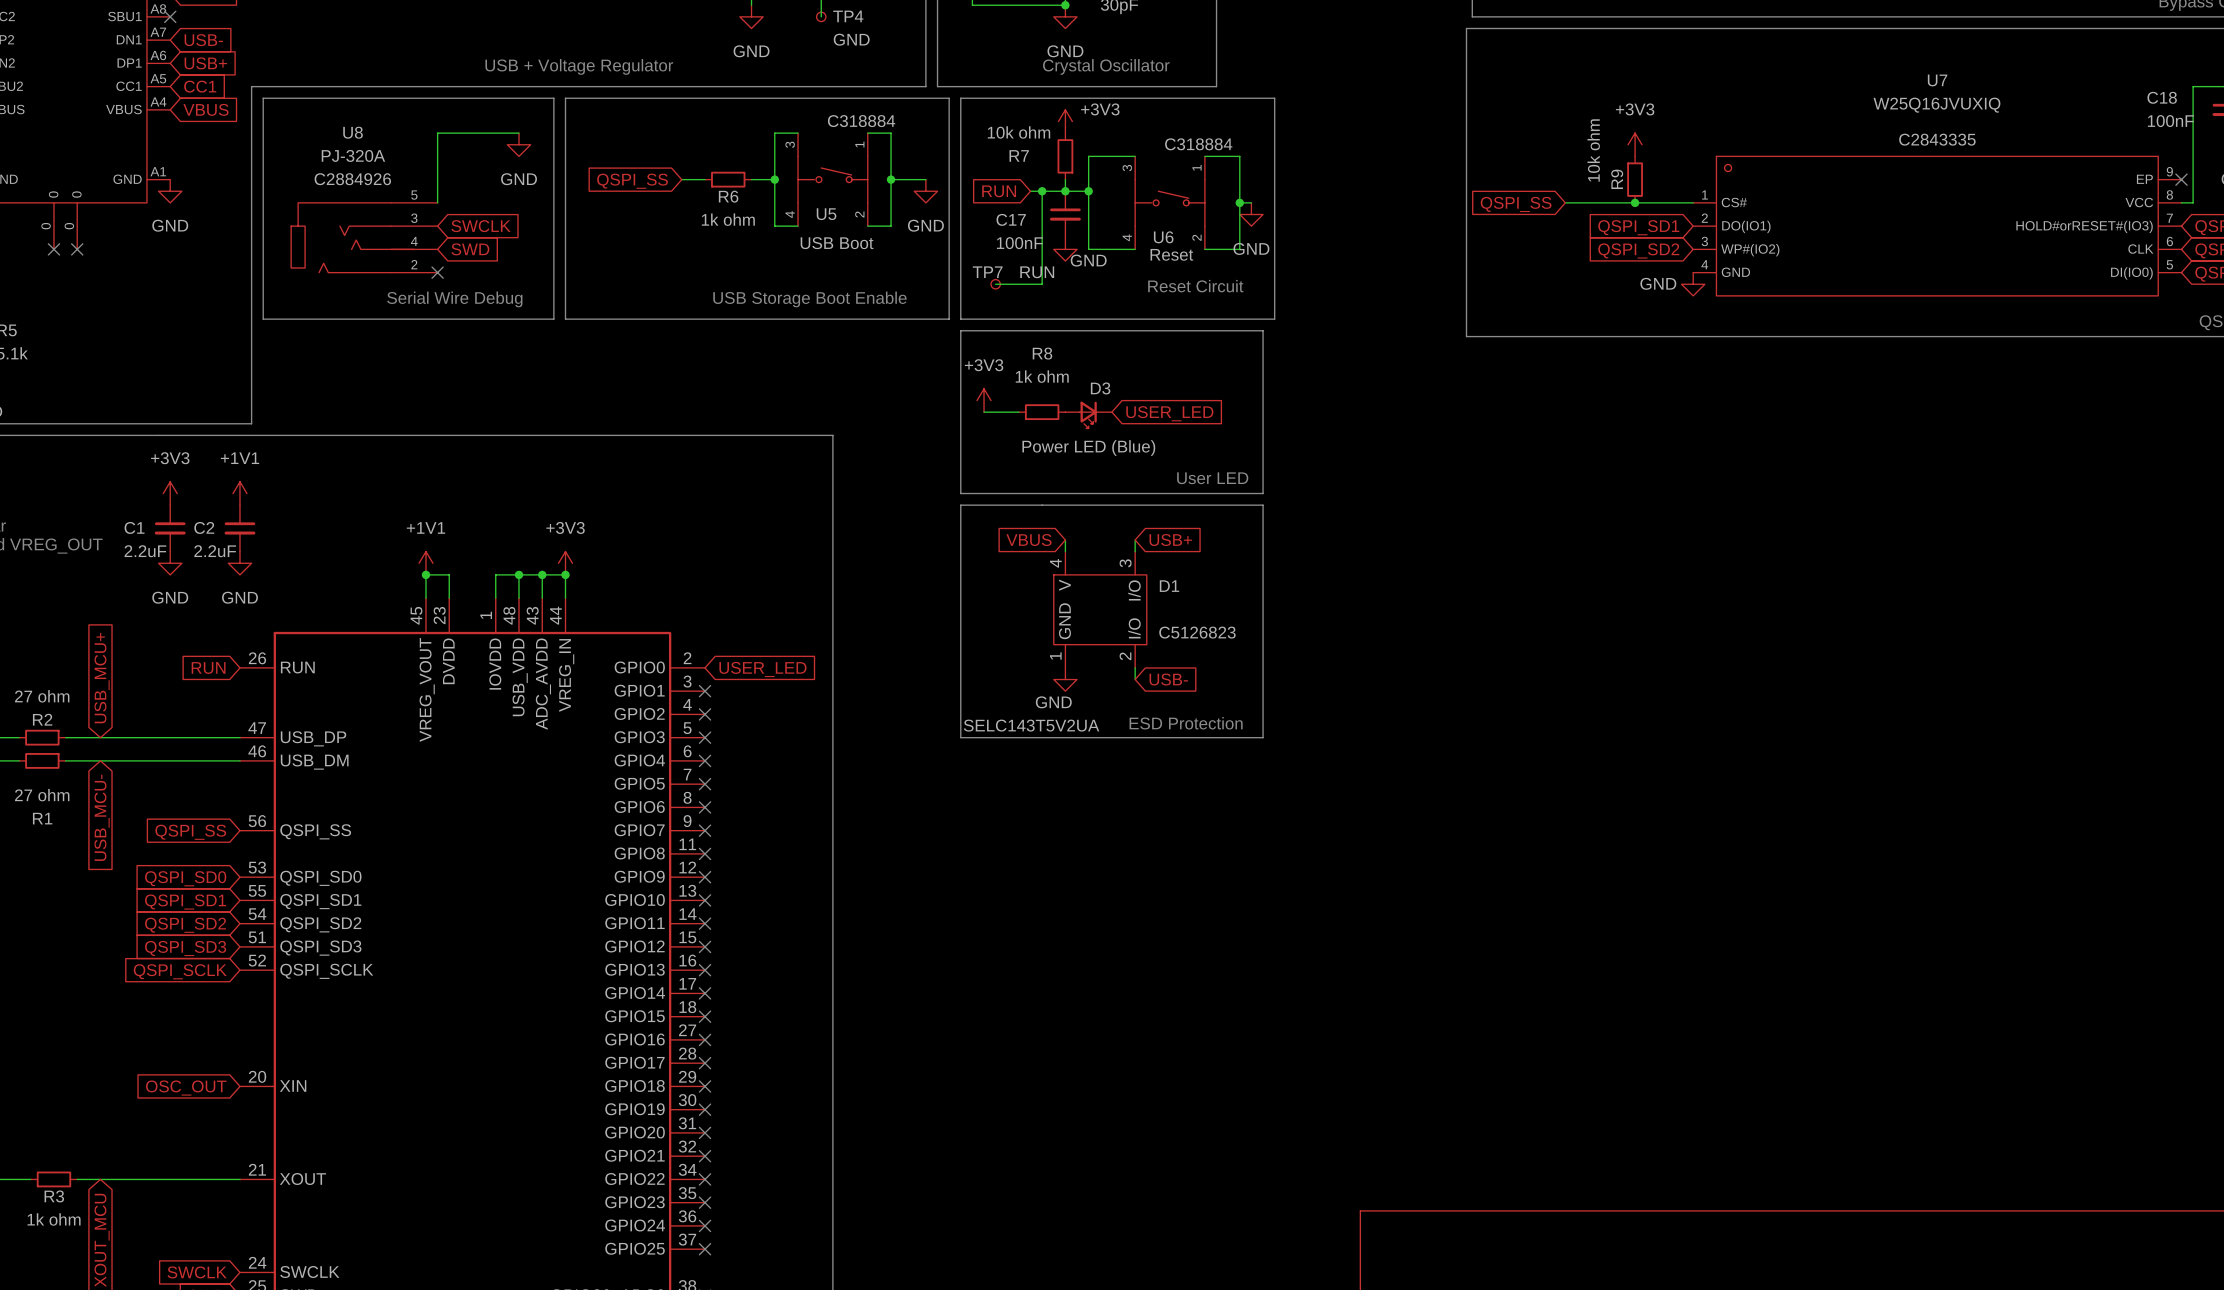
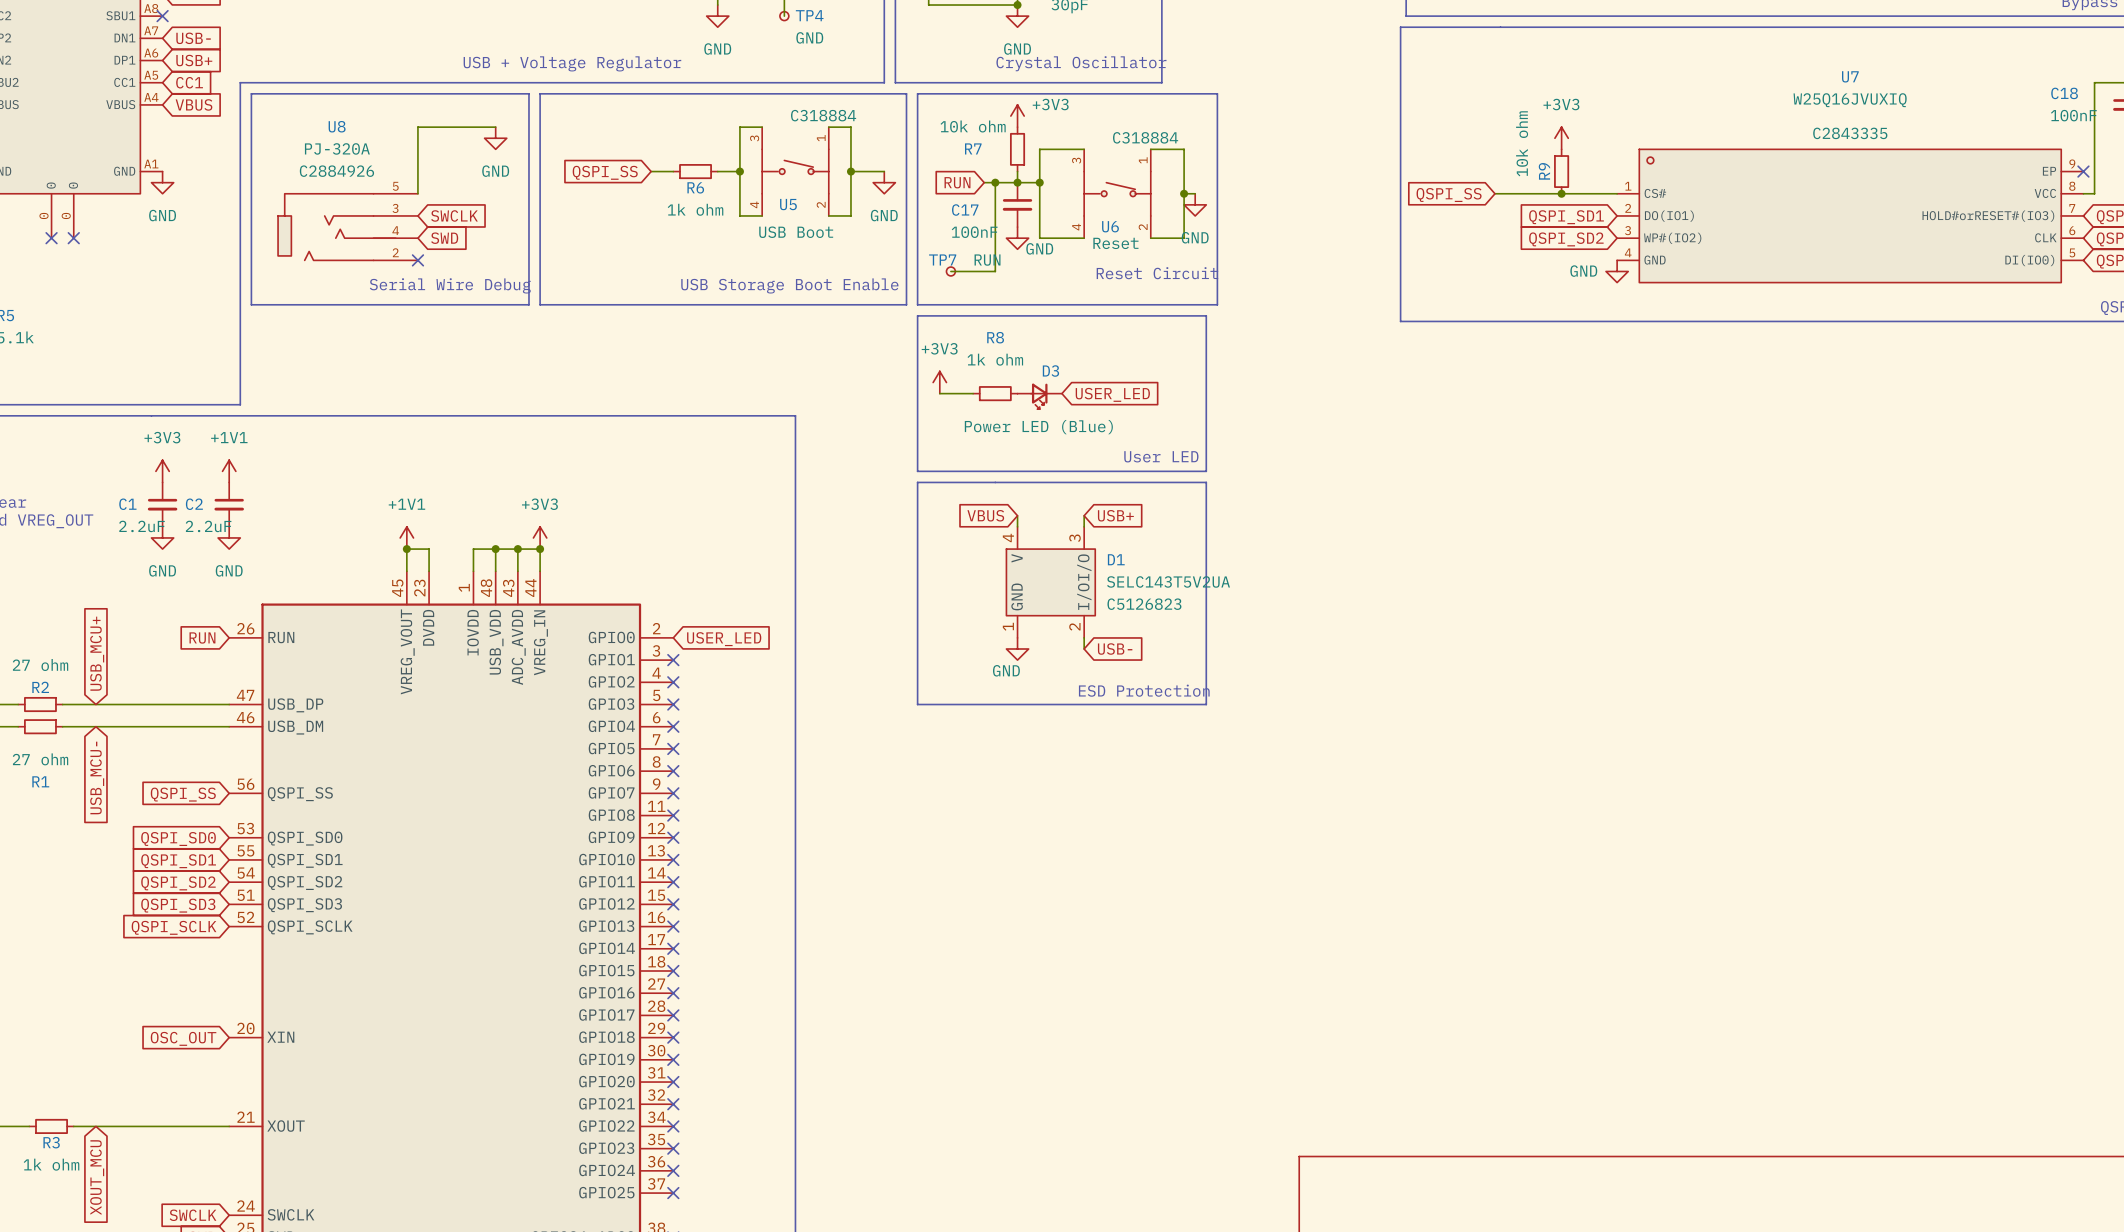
D1 value position: SELC143T5V2UA (1031, 725) -> SELC143T5V2UA (1168, 581)

